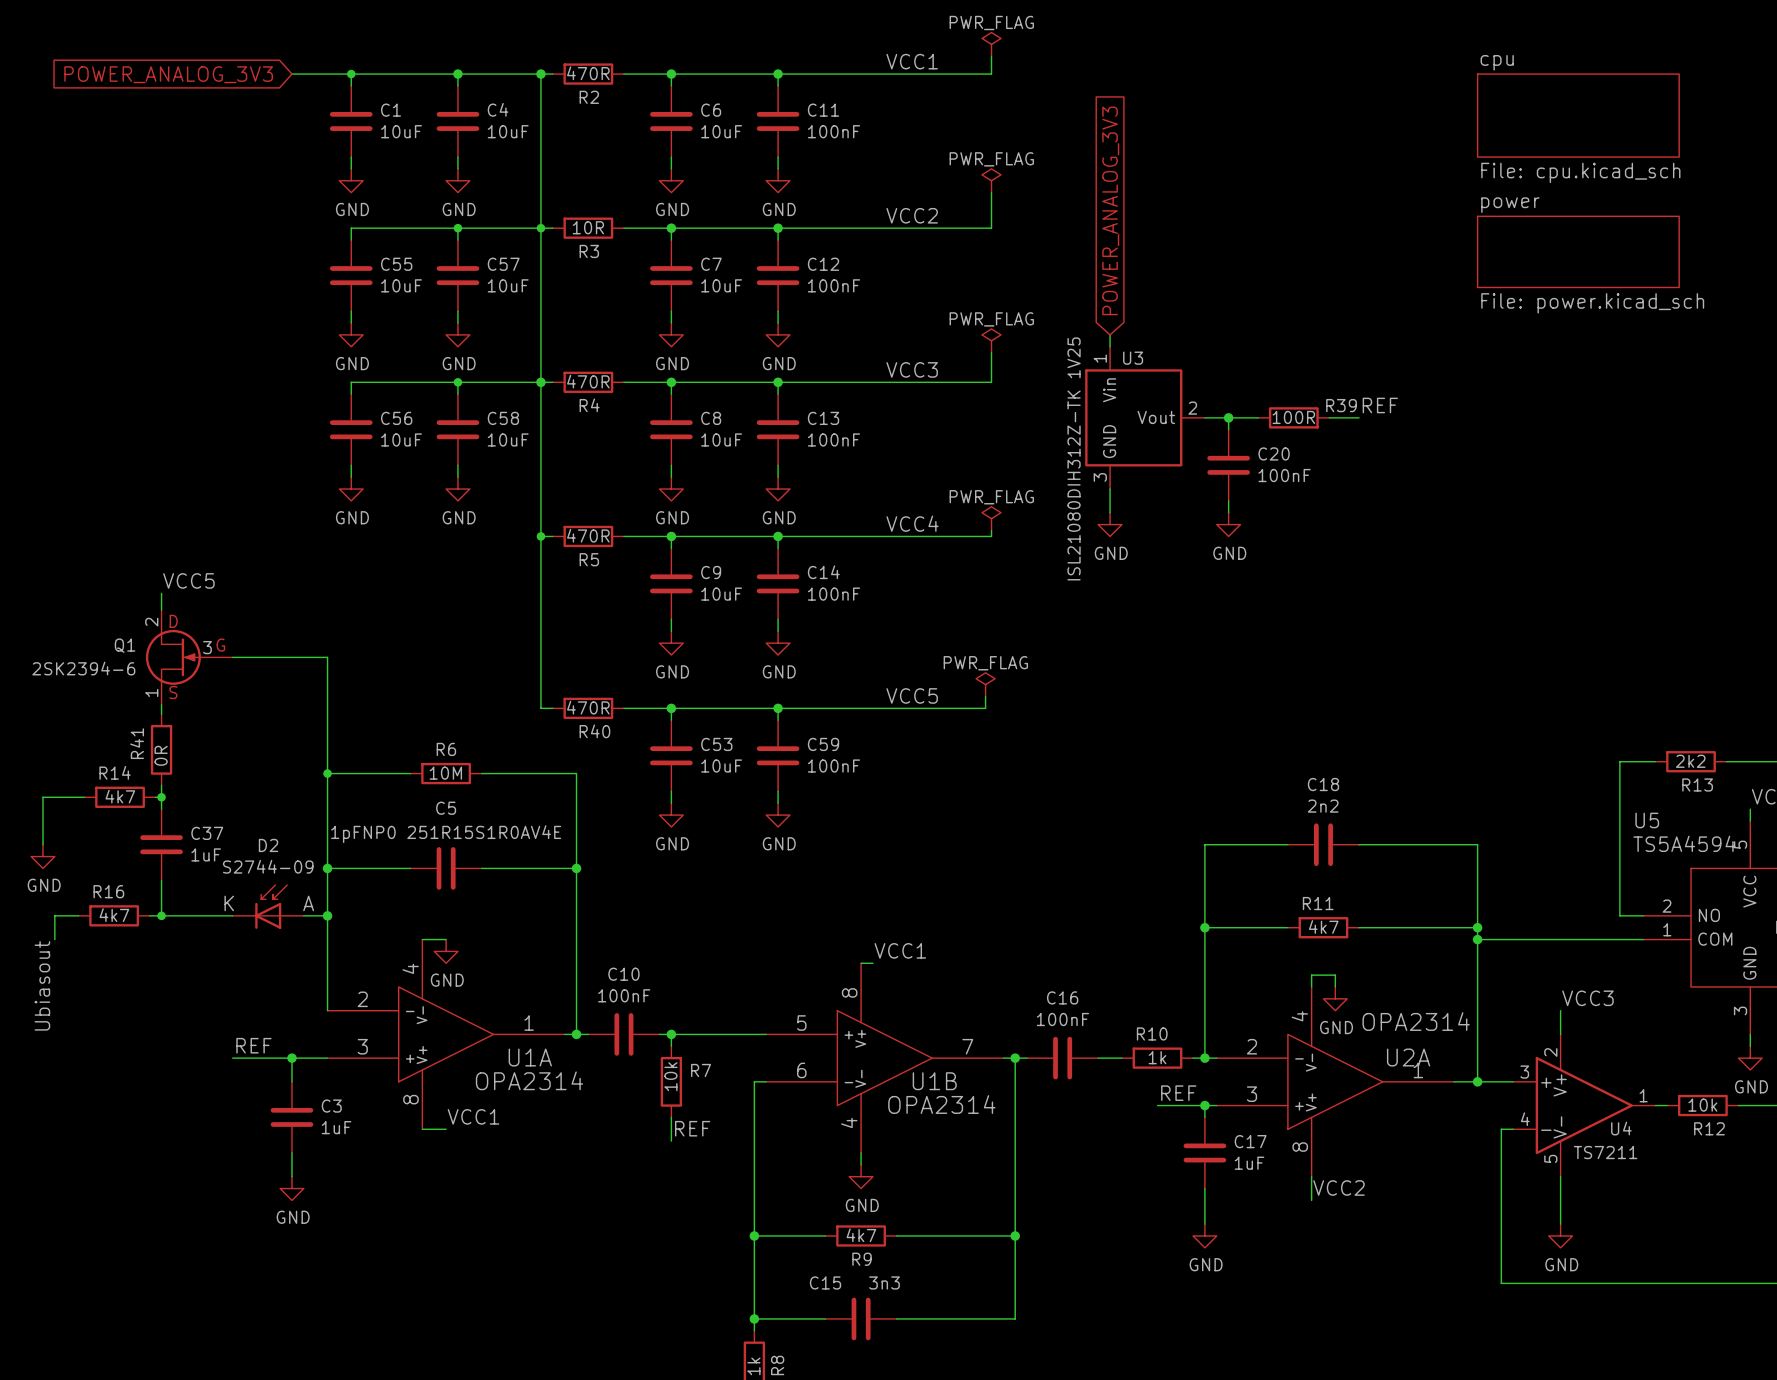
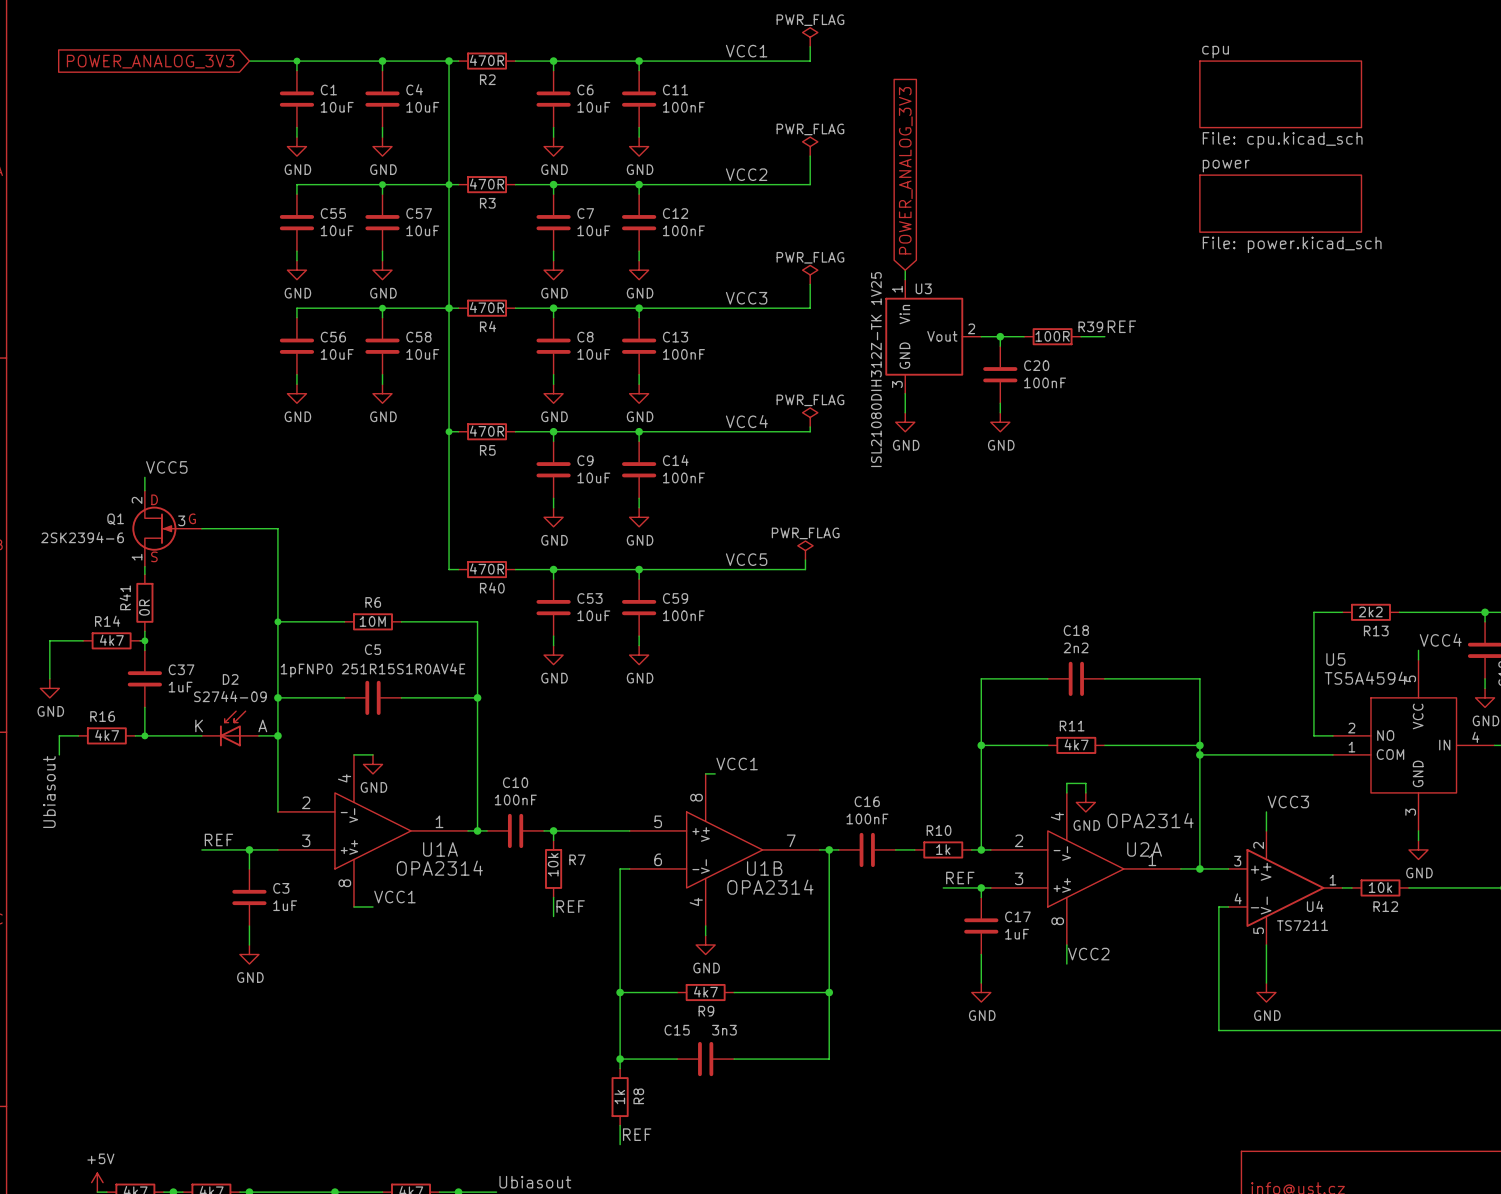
R3 value: 10R (588, 227) -> 470R (487, 184)

